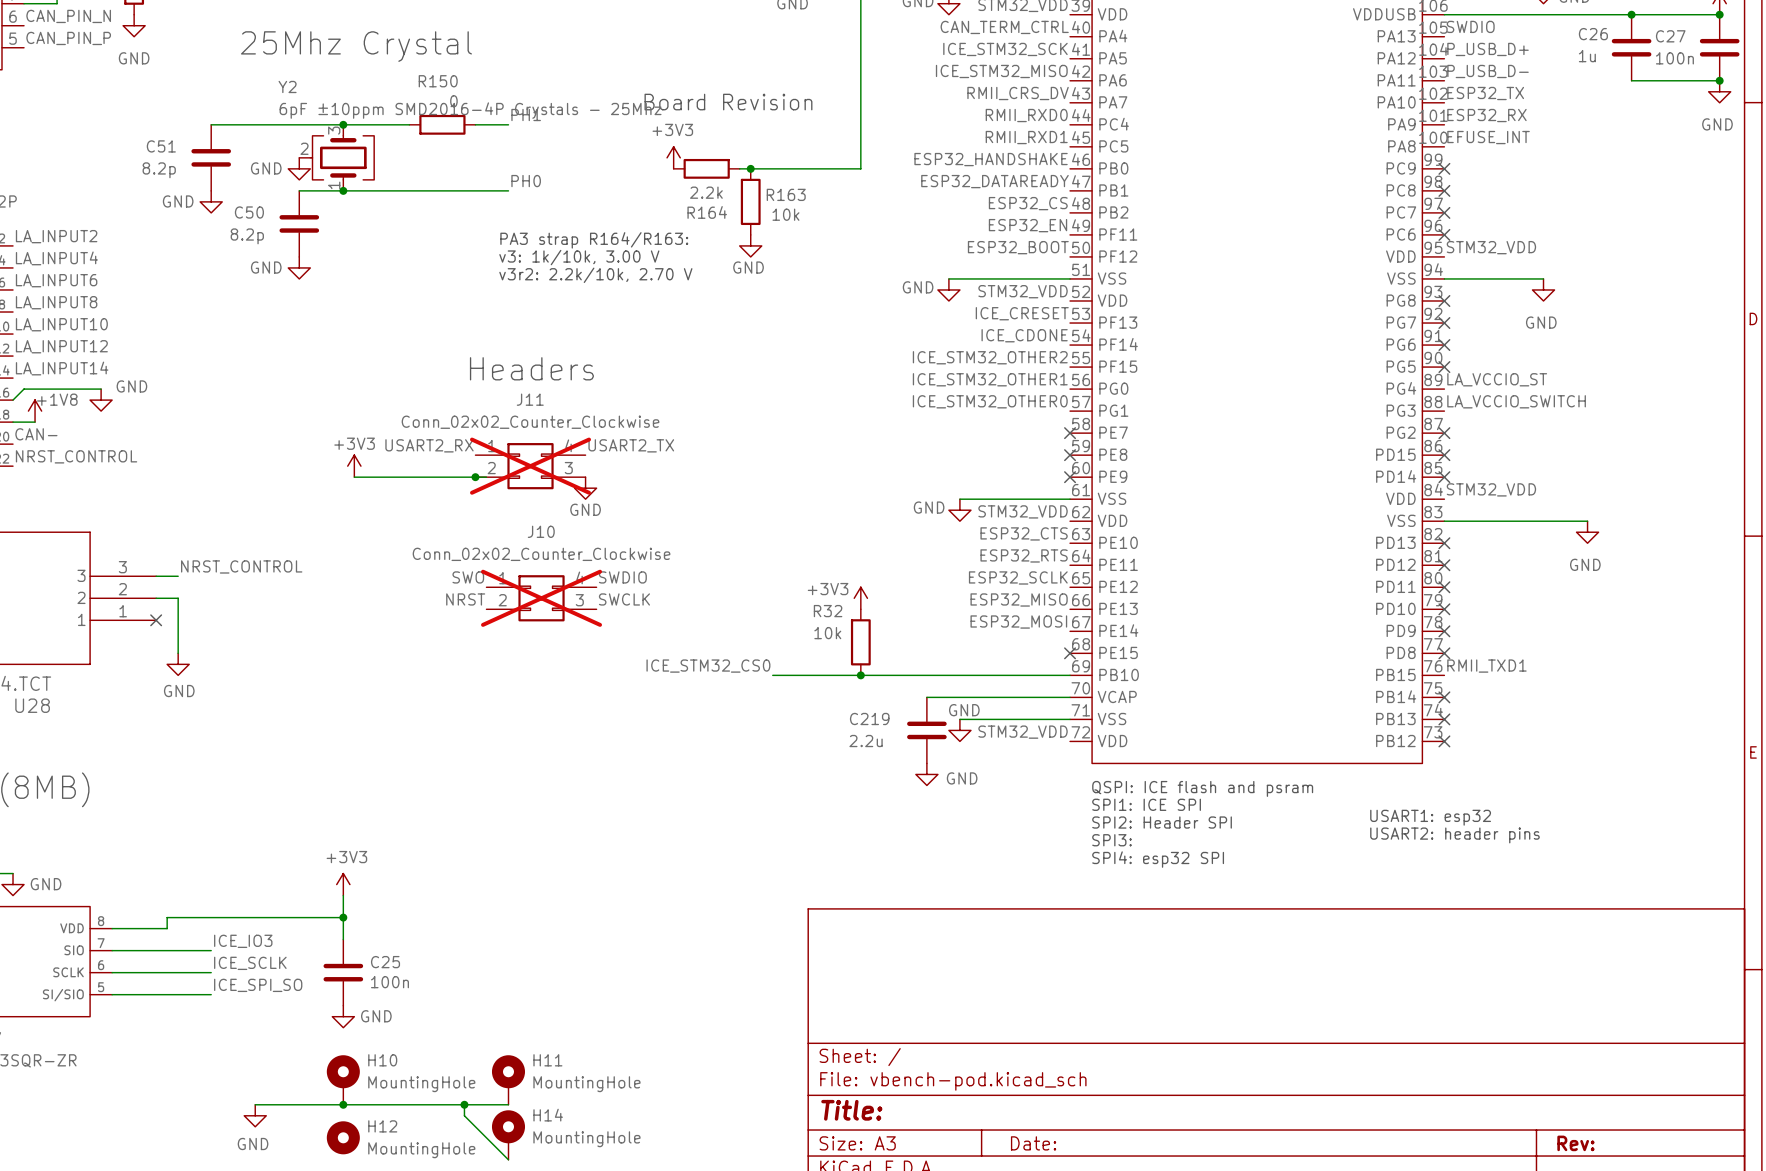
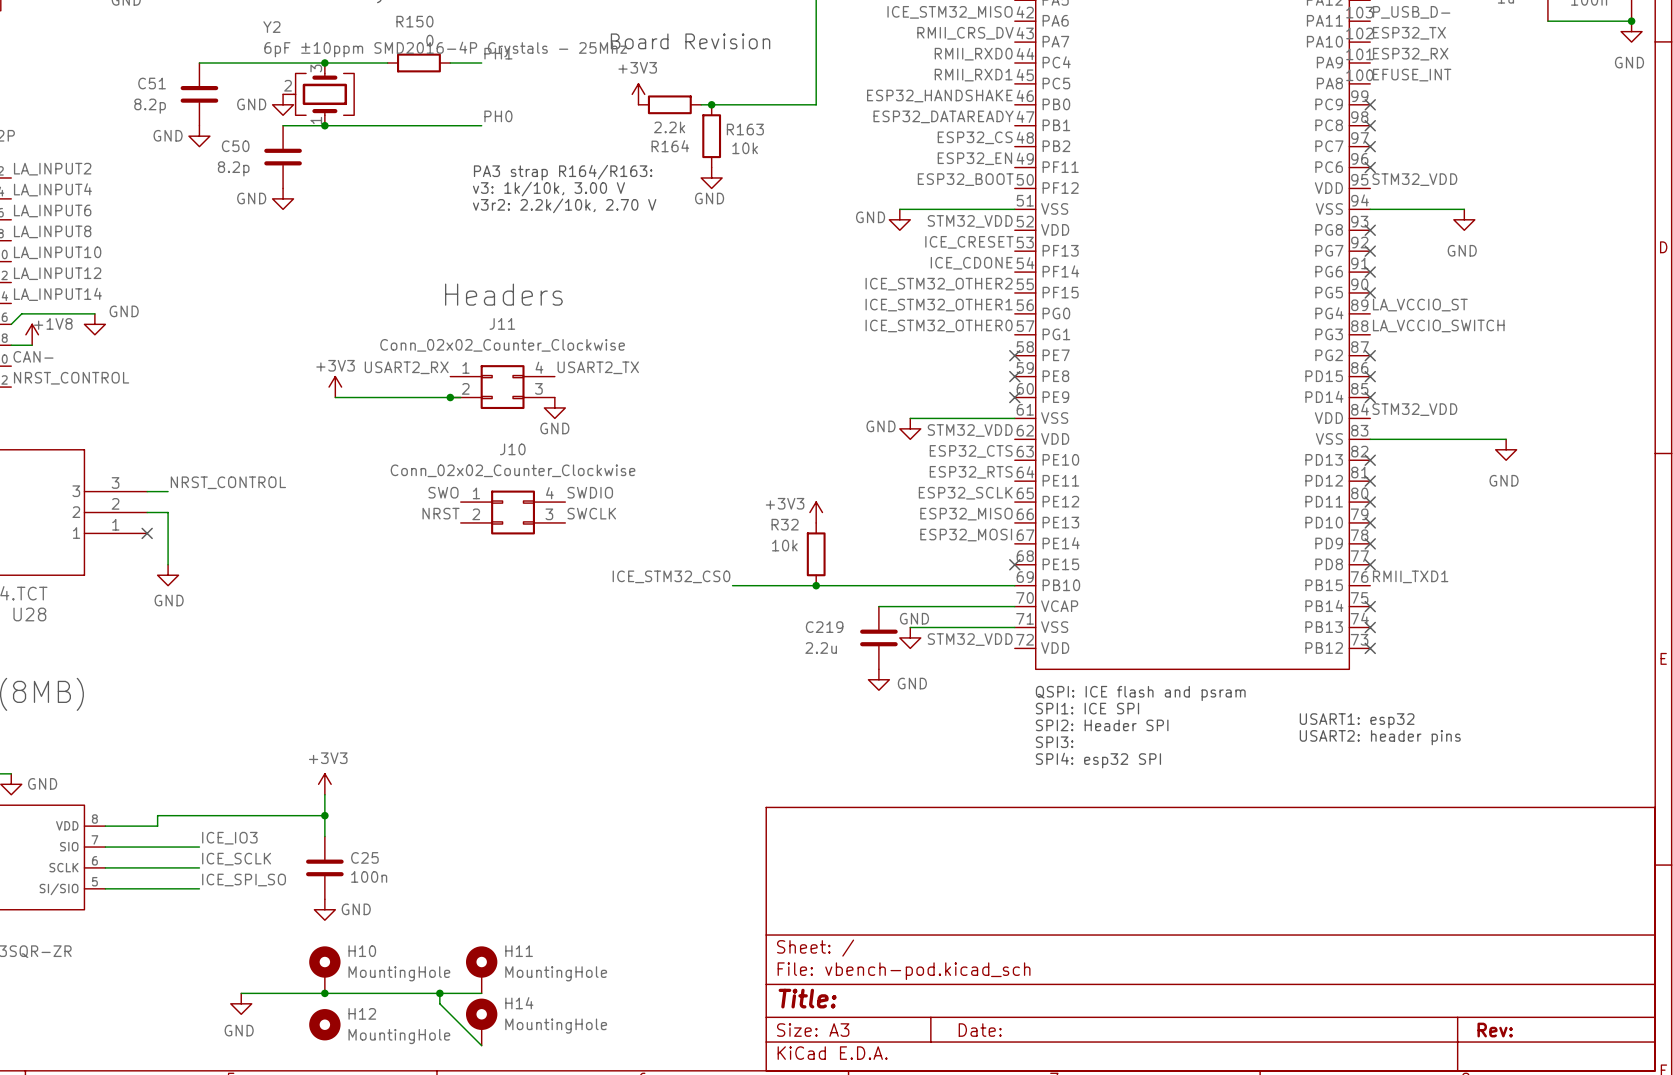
J11 do-not-place cross: (530, 466) -> none
J10 do-not-place cross: (541, 598) -> none

